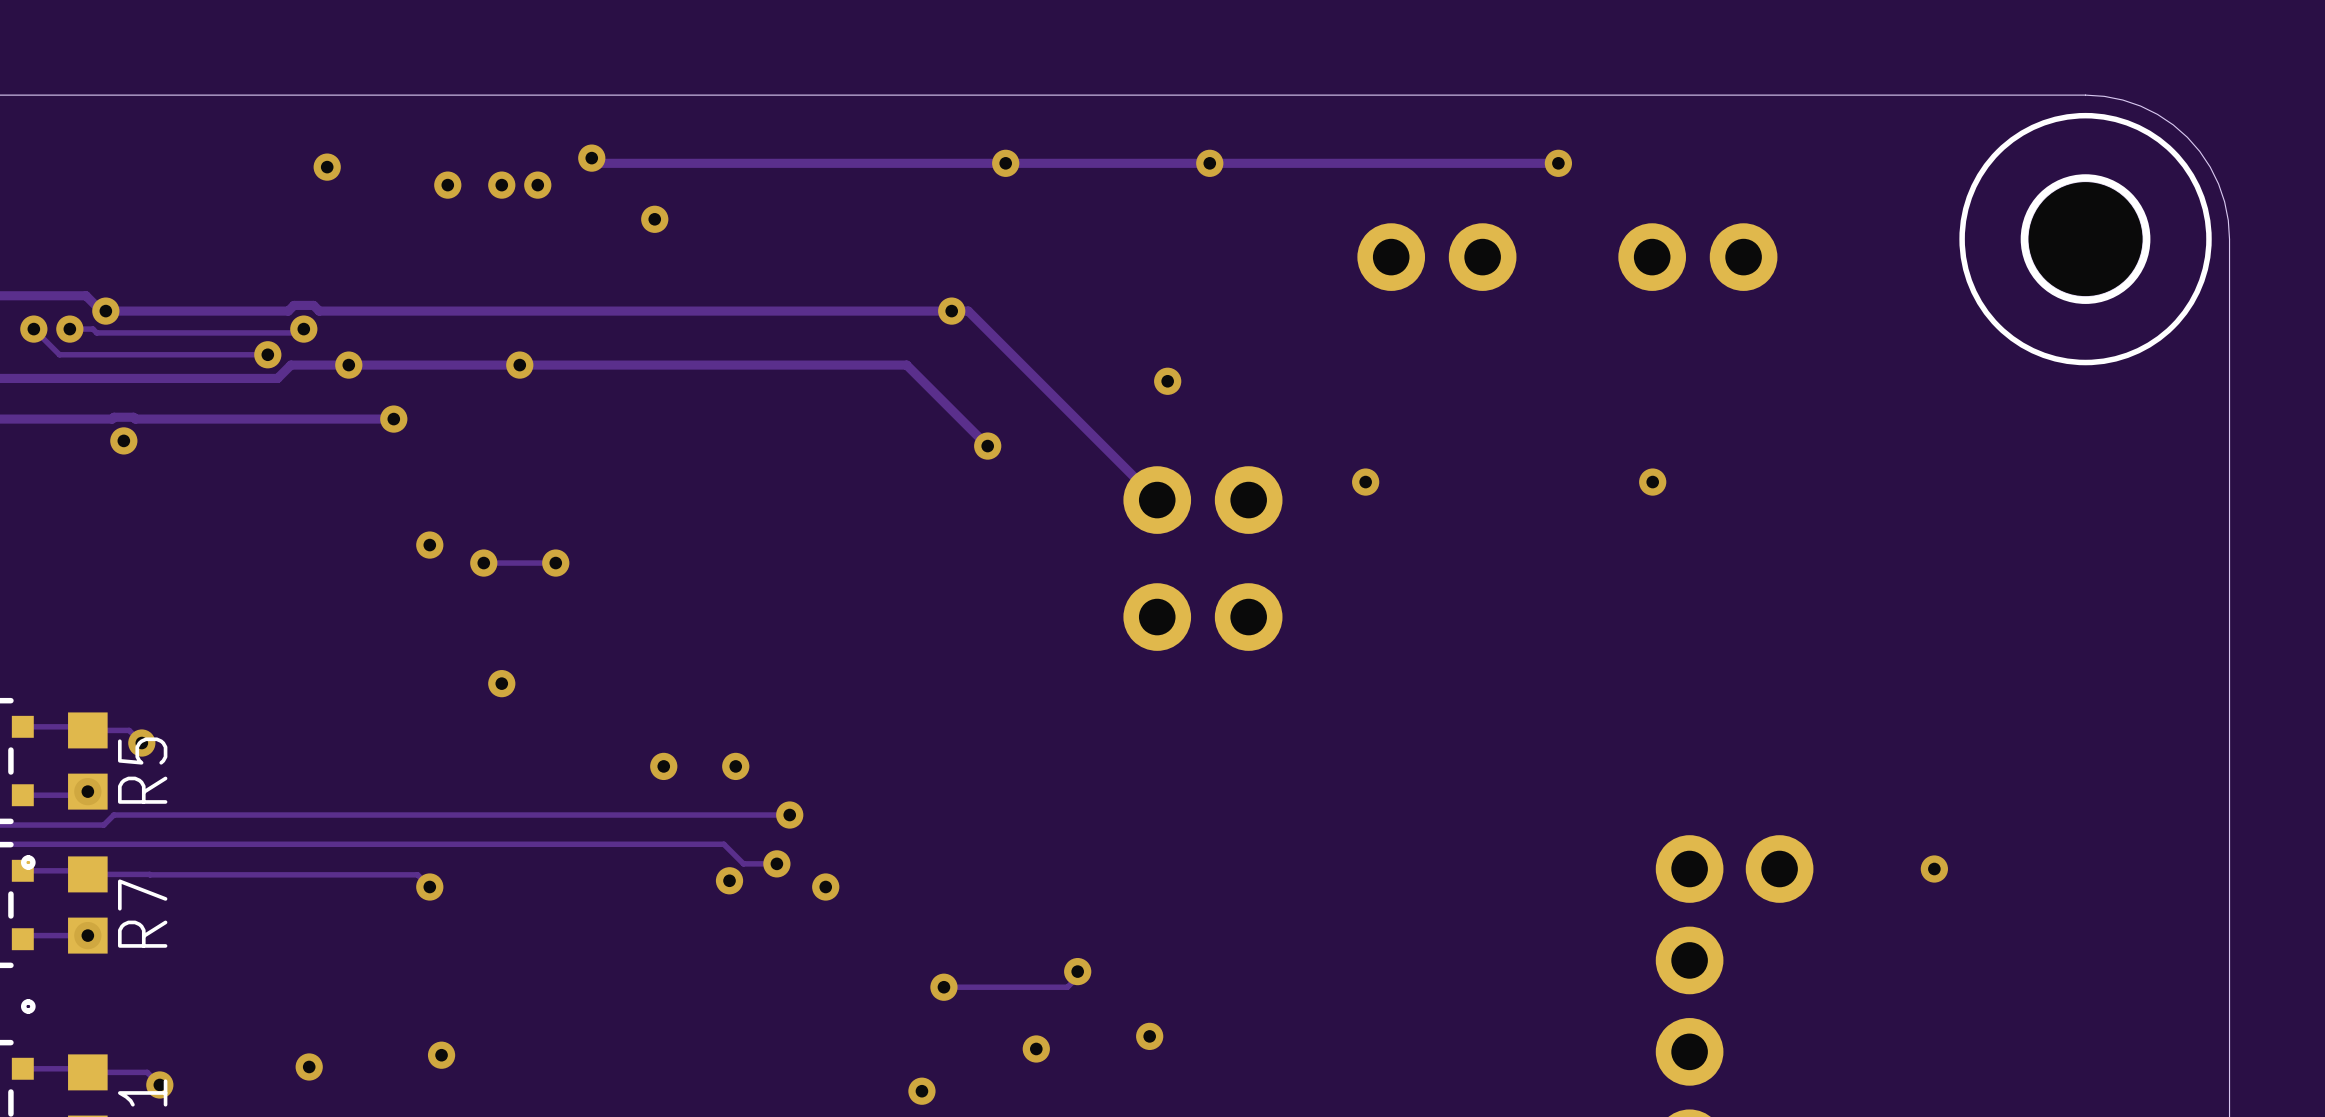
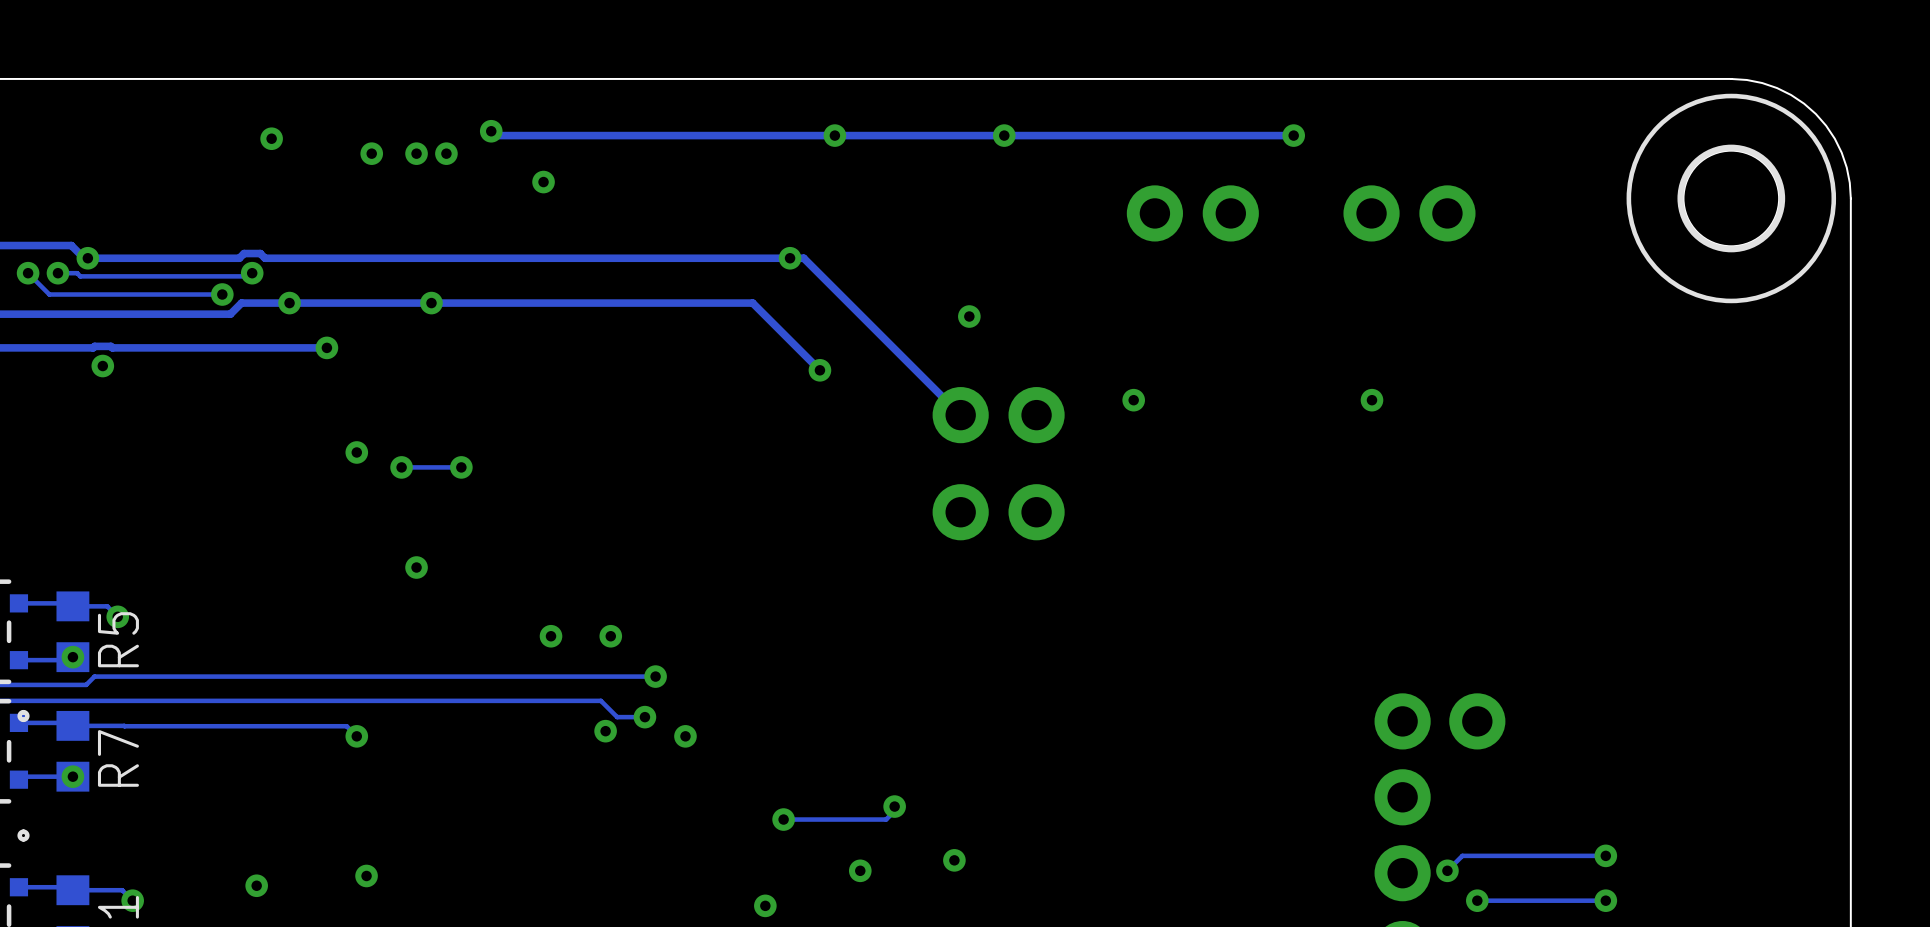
via: (1934, 869) -> none
track: none -> (1605, 855) (1462, 855) (1447, 870)
via: none -> (1605, 855)
via: none -> (1447, 870)
via: none -> (1477, 900)
track: none -> (1605, 900) (1477, 900)
via: none -> (1605, 900)

